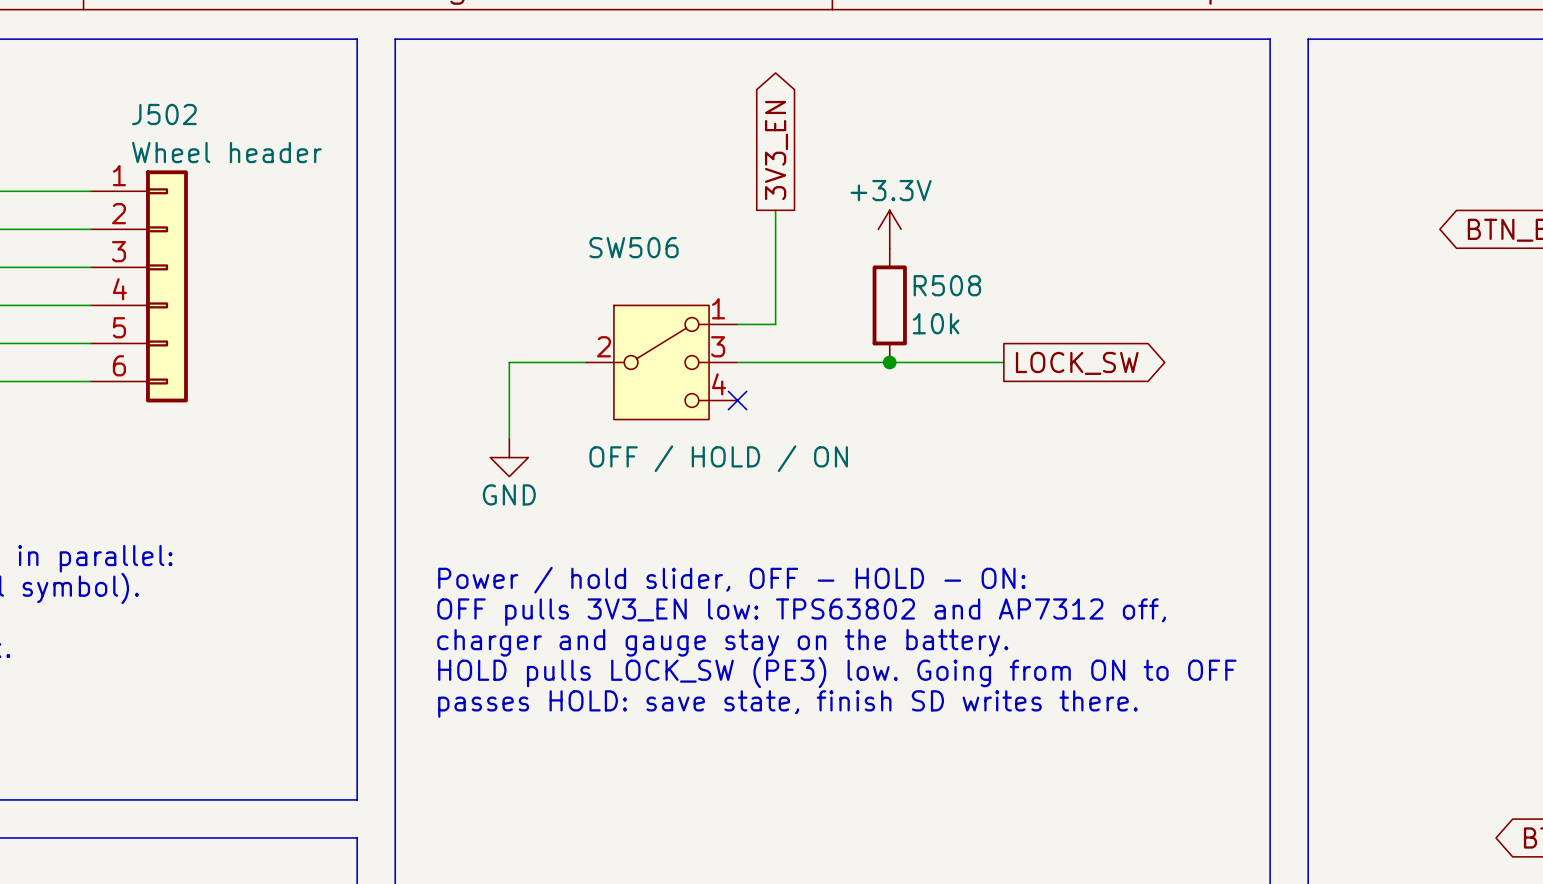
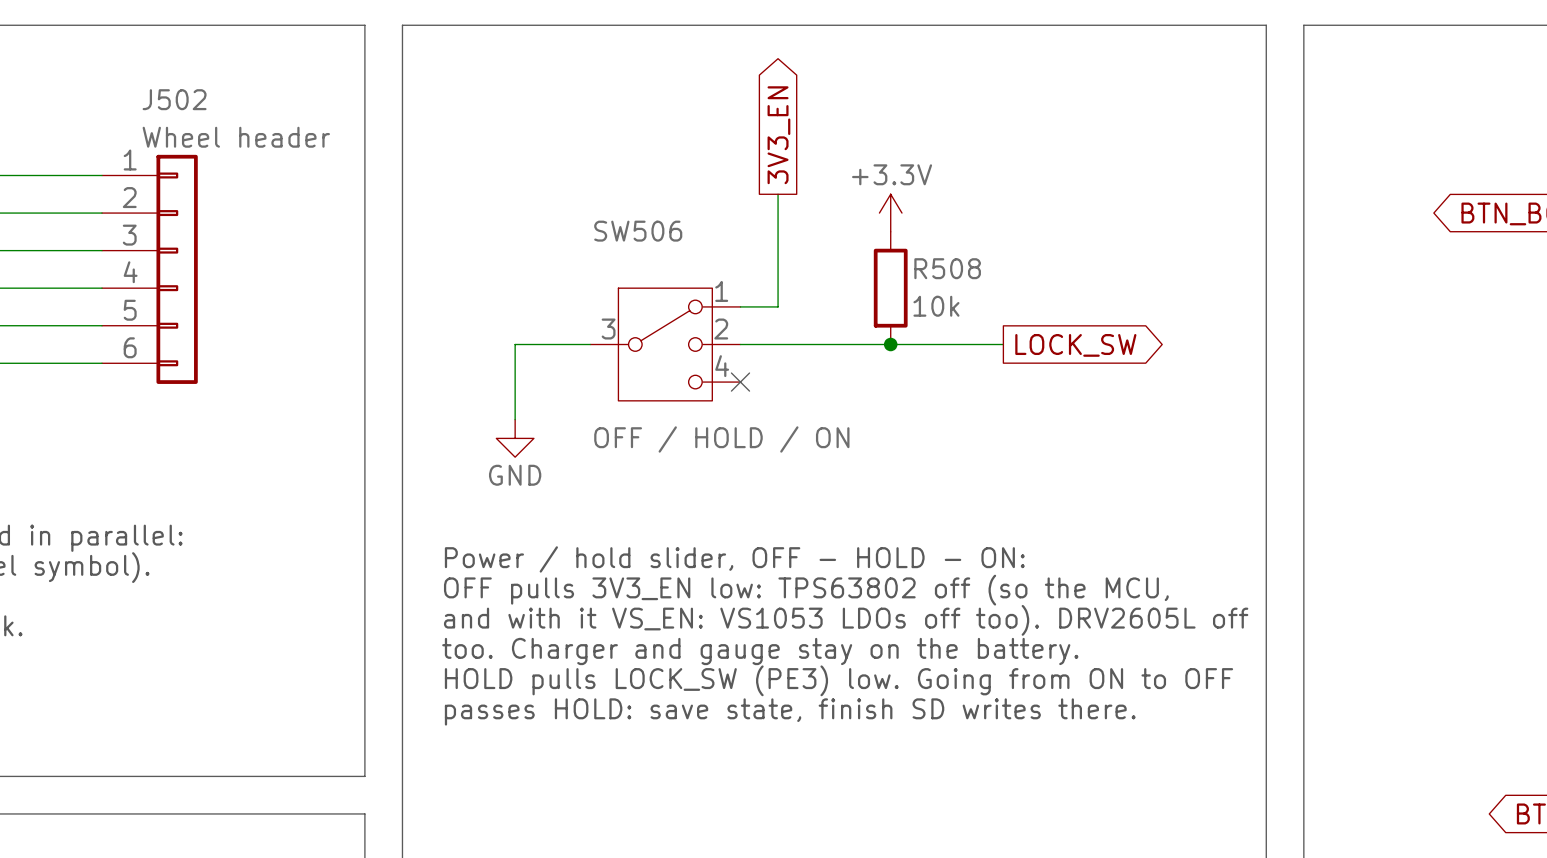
SW506 pin number: 2 (603, 346) -> 3 (608, 329)
SW506 pin number: 3 (718, 346) -> 2 (721, 329)
text: OFF pulls 3V3_EN low: TPS63802 and AP7312 off, (801, 612) -> OFF pulls 3V3_EN low: TPS63802 off (so the MCU, (806, 590)
text: charger and gauge stay on the battery. (722, 642) -> and with it VS_EN: VS1053 LDOs off too). DRV2605L off (846, 620)
text: HOLD pulls LOCK_SW (PE3) low. Going from ON to OFF (837, 672) -> too. Charger and gauge stay on the battery. (760, 651)
text: passes HOLD: save state, finish SD writes there. (787, 704) -> HOLD pulls LOCK_SW (PE3) low. Going from ON to OFF (838, 680)
text: none -> passes HOLD: save state, finish SD writes there. (790, 711)

